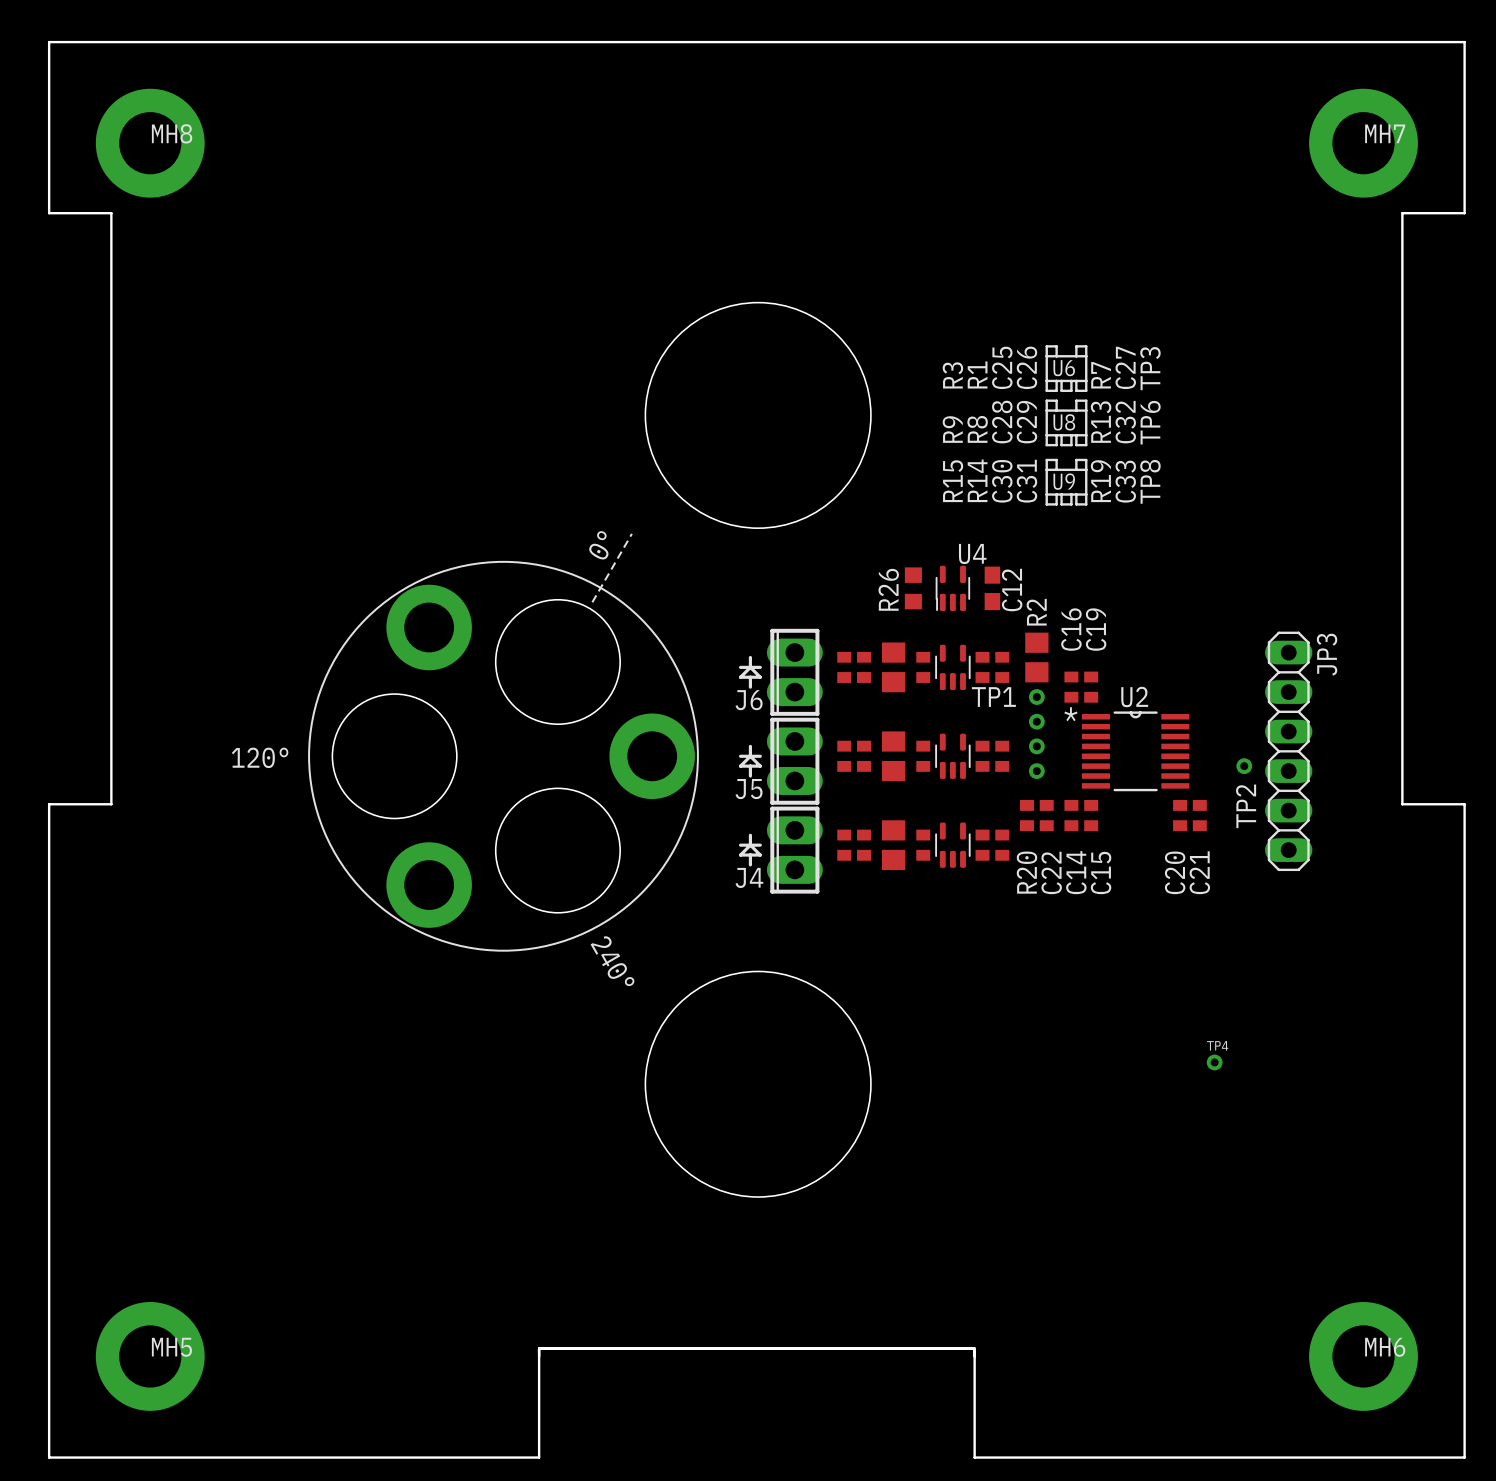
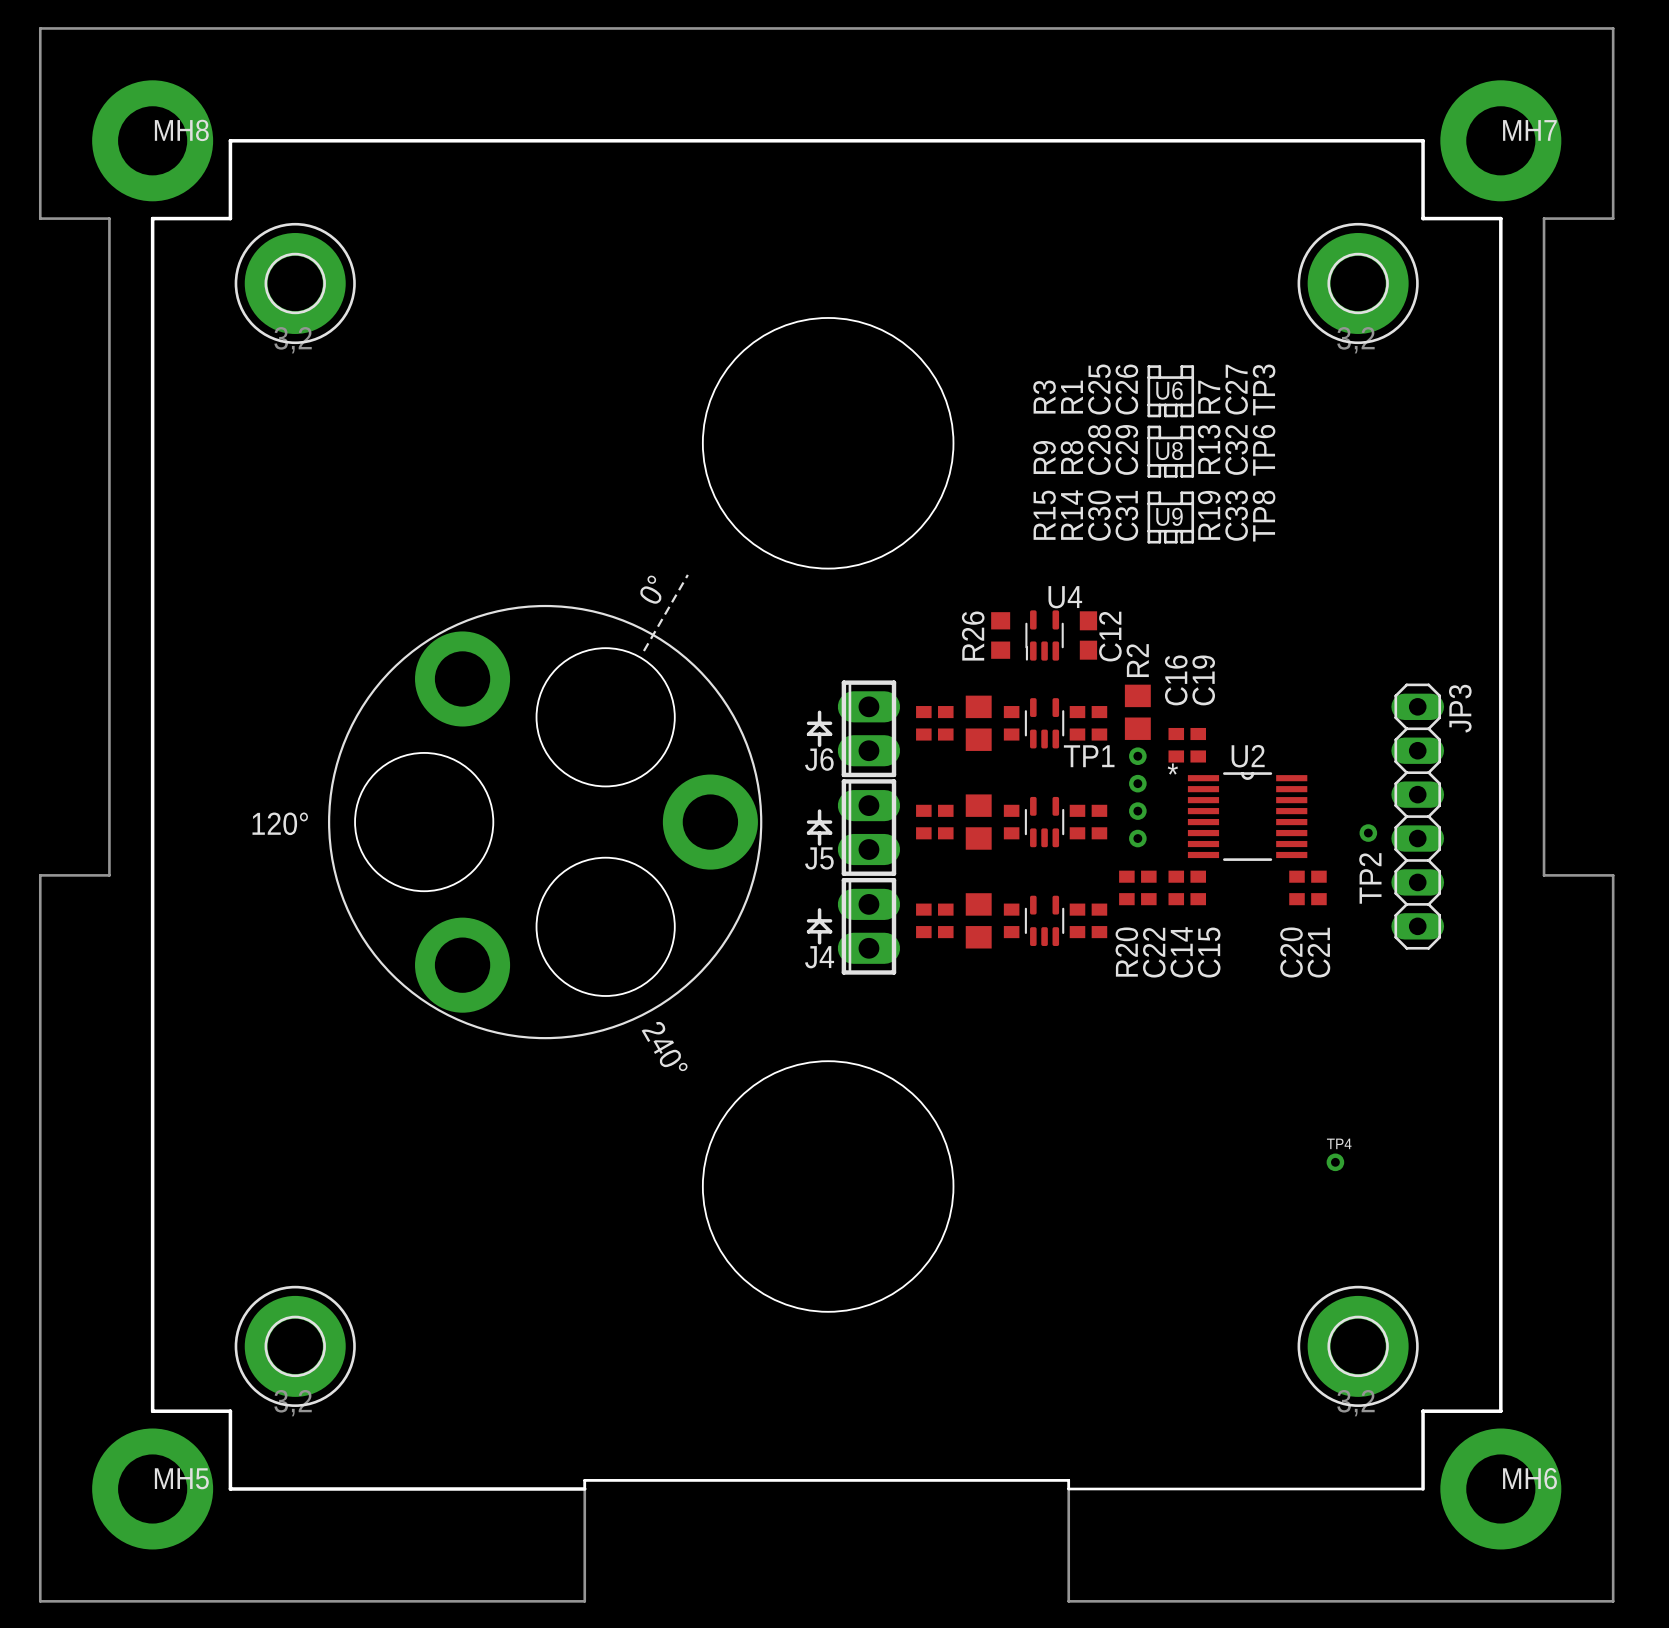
line: none -> (40, 28) (1613, 28) (1613, 218) (1544, 218) (1544, 875) (1613, 875) (1613, 1601) (1068, 1601) (1068, 1480) (584, 1480) (584, 1601) (40, 1601) (40, 875) (109, 875) (109, 218) (40, 218) (40, 28)
part: none -> (295, 283)
part: none -> (1358, 283)
part: none -> (295, 1346)
part: none -> (1358, 1346)
board edge: (539, 1356) (539, 1457) (49, 1457) (49, 804) (111, 804) (111, 213) (49, 213) (49, 42) (1464, 42) (1464, 213) (1402, 213) (1402, 804) (1464, 804) (1464, 1457) (974, 1457) (974, 1356) -> (584, 1488) (230, 1488) (230, 1411) (152, 1411) (152, 218) (230, 218) (230, 140) (1423, 140) (1423, 218) (1500, 218) (1500, 1411) (1423, 1411) (1423, 1488) (1068, 1488)

